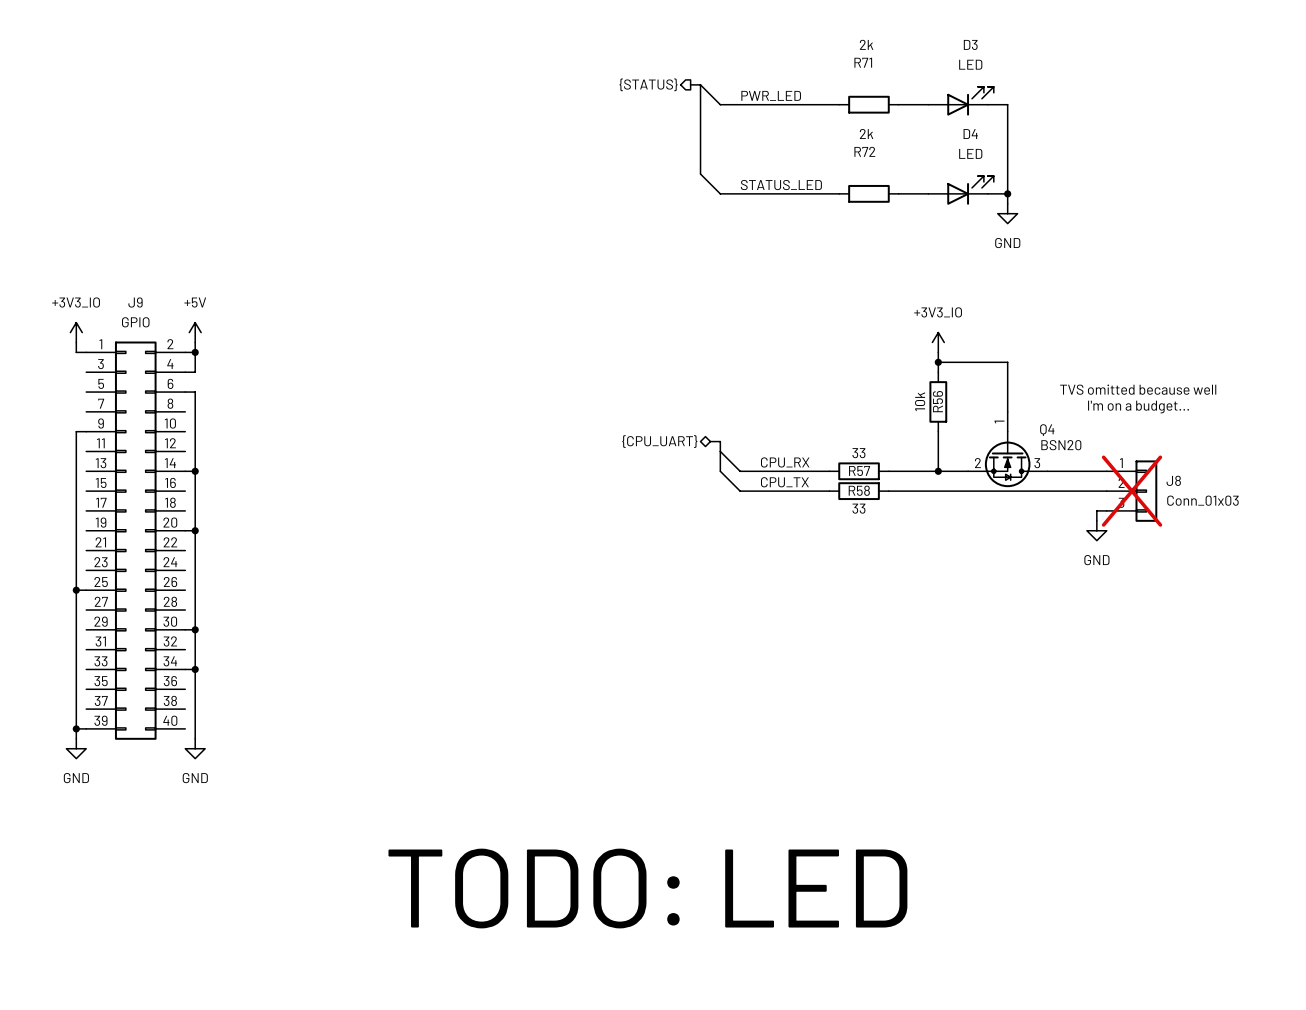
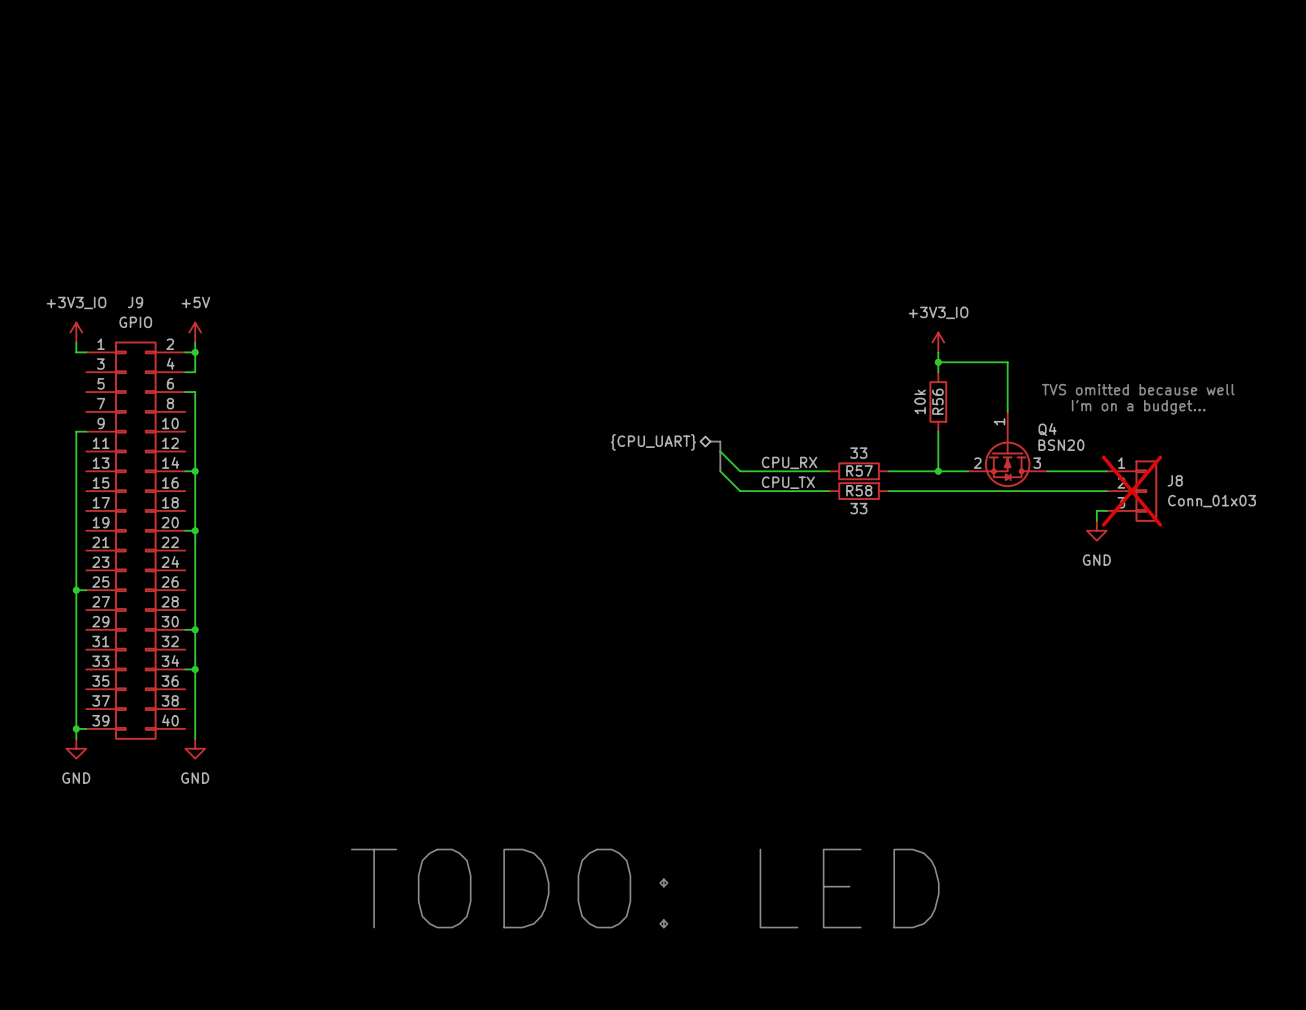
hierarchical label: {STATUS} (648, 84) -> none
bus: (690, 84) (700, 84) (700, 174) -> none
wire: (700, 84) (720, 104) (839, 104) -> none
label: PWR_LED (771, 95) -> none
D3: LED (961, 101) -> none
R71: 2k (868, 104) -> none
wire: (898, 104) (928, 104) -> none
wire: (987, 104) (1007, 104) (1007, 203) -> none
wire: (700, 174) (720, 193) (839, 193) -> none
label: STATUS_LED (781, 185) -> none
D4: LED (961, 190) -> none
R72: 2k (868, 193) -> none
wire: (898, 193) (928, 193) -> none
wire: (987, 193) (1007, 193) -> none
junction: (1007, 193) -> none
power symbol: GND (1007, 213) -> none

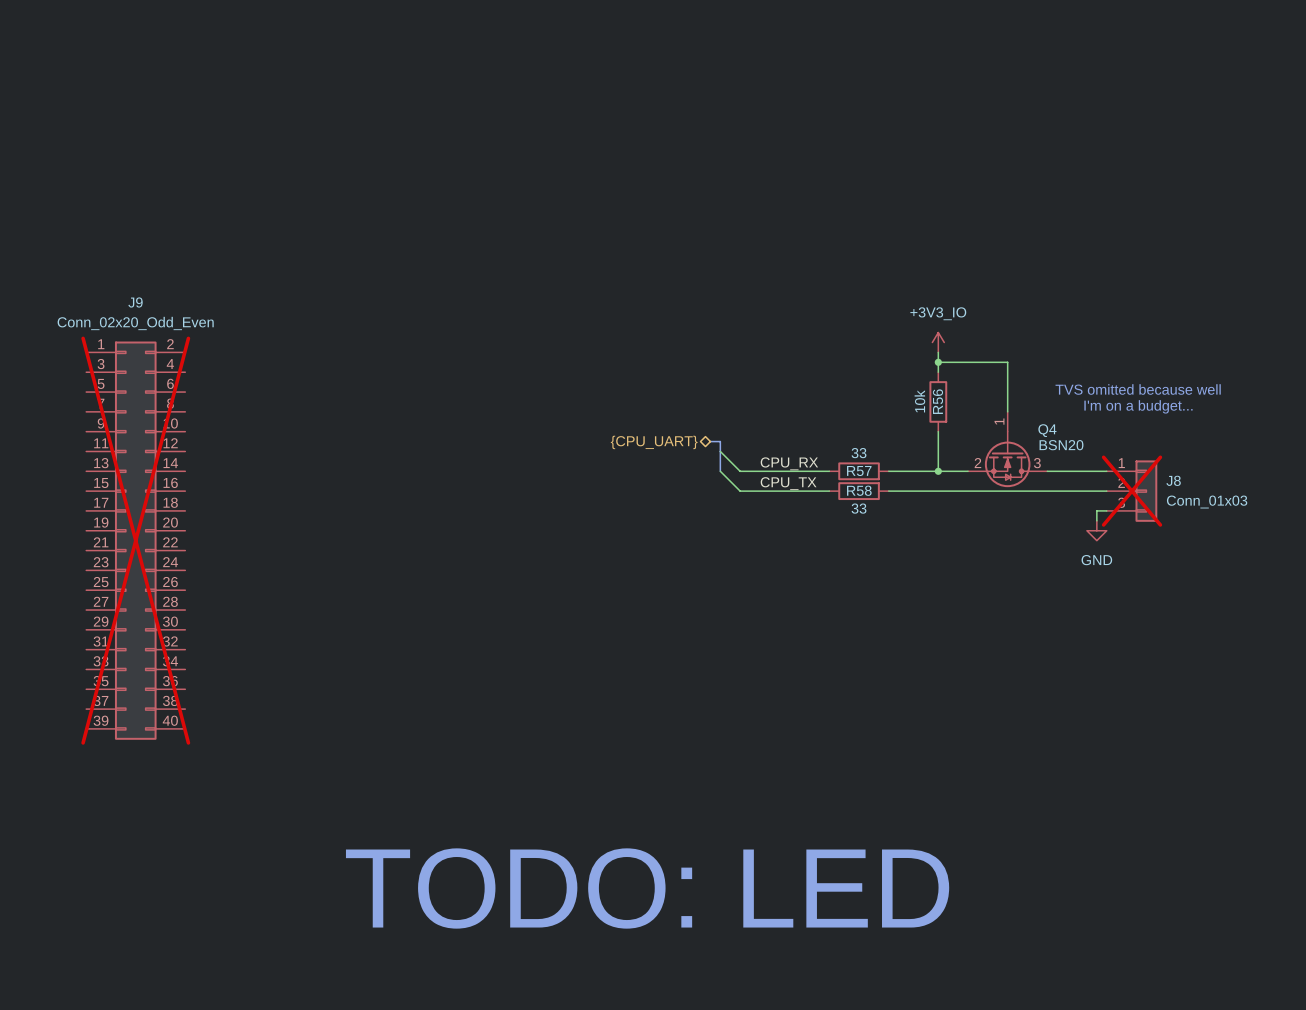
J9 value: GPIO (135, 322) -> Conn_02x20_Odd_Even (135, 323)
power symbol: +3V3_IO (76, 332) -> none
power symbol: +5V (195, 332) -> none
wire: (76, 342) (76, 352) (86, 352) -> none
wire: (195, 342) (195, 372) (185, 372) -> none
wire: (185, 352) (195, 352) -> none
junction: (195, 352) -> none
wire: (185, 392) (195, 392) (195, 738) -> none
wire: (86, 431) (76, 431) (76, 738) -> none
wire: (185, 471) (195, 471) -> none
junction: (195, 471) -> none
wire: (185, 530) (195, 530) -> none
junction: (195, 530) -> none
J9 do-not-place cross: none -> (135, 540)
wire: (76, 590) (86, 590) -> none
junction: (76, 590) -> none
wire: (185, 629) (195, 629) -> none
junction: (195, 629) -> none
wire: (185, 669) (195, 669) -> none
junction: (195, 669) -> none
wire: (76, 728) (86, 728) -> none
junction: (76, 728) -> none
power symbol: GND (76, 748) -> none
power symbol: GND (195, 748) -> none

